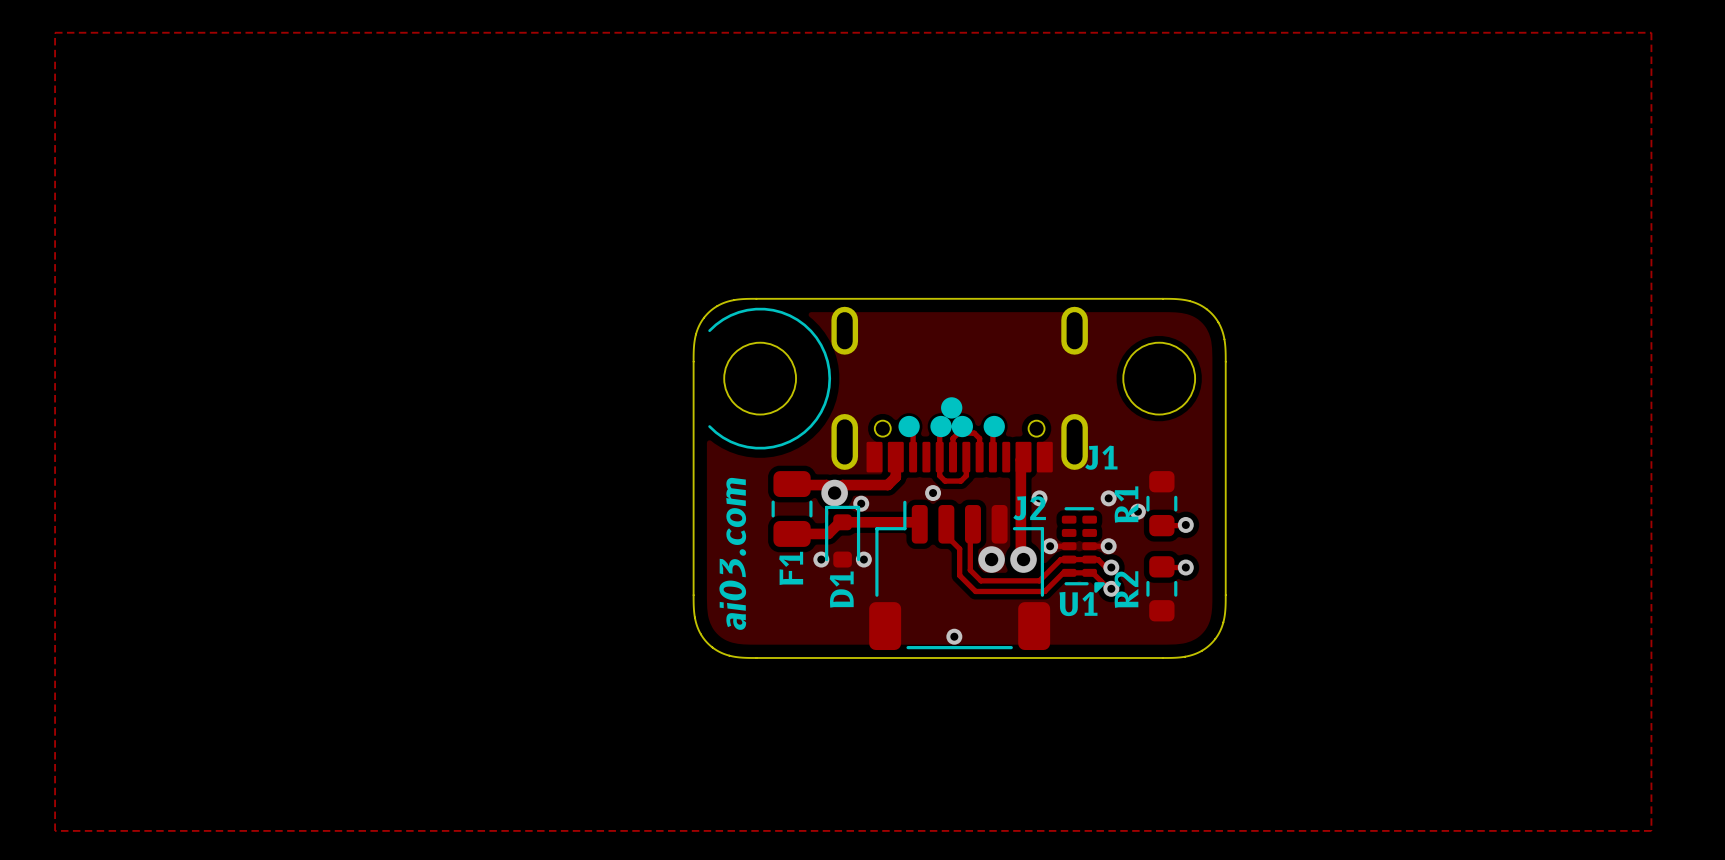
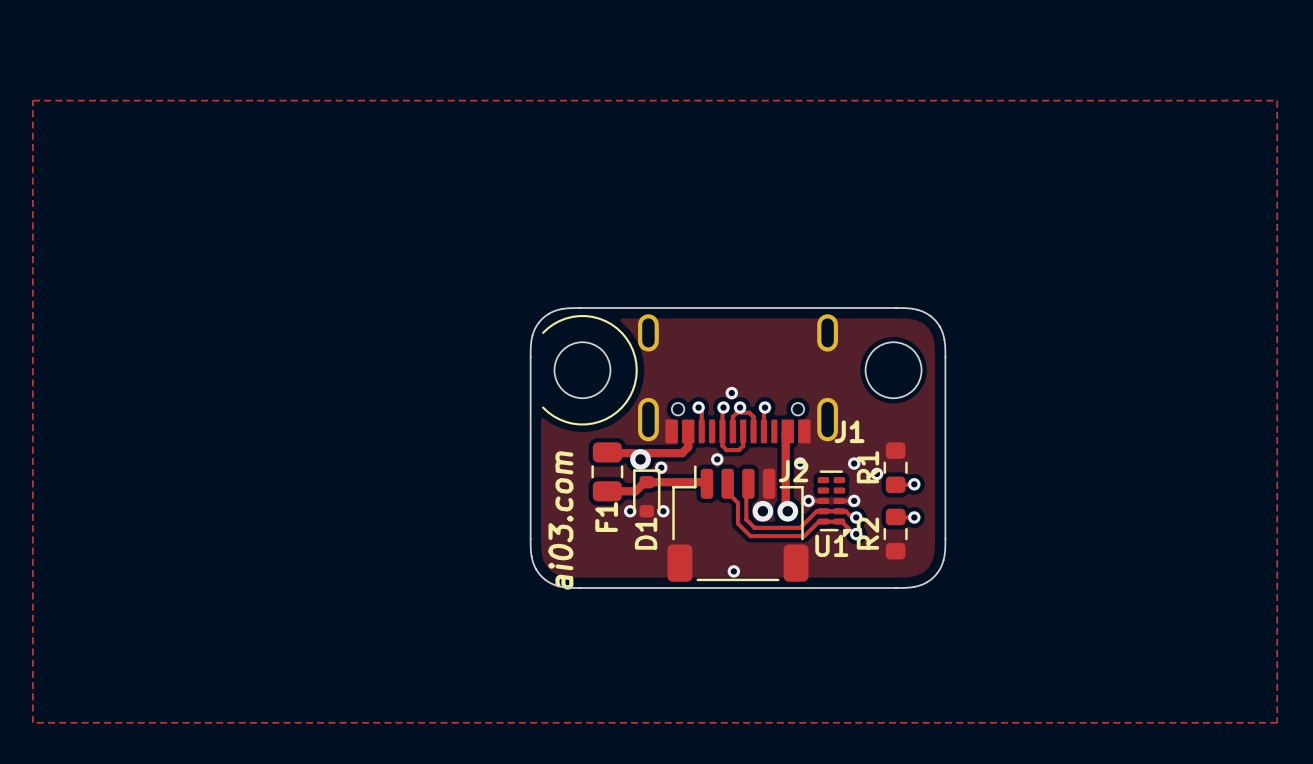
drawing: [898, 397, 1005, 438] -> none

